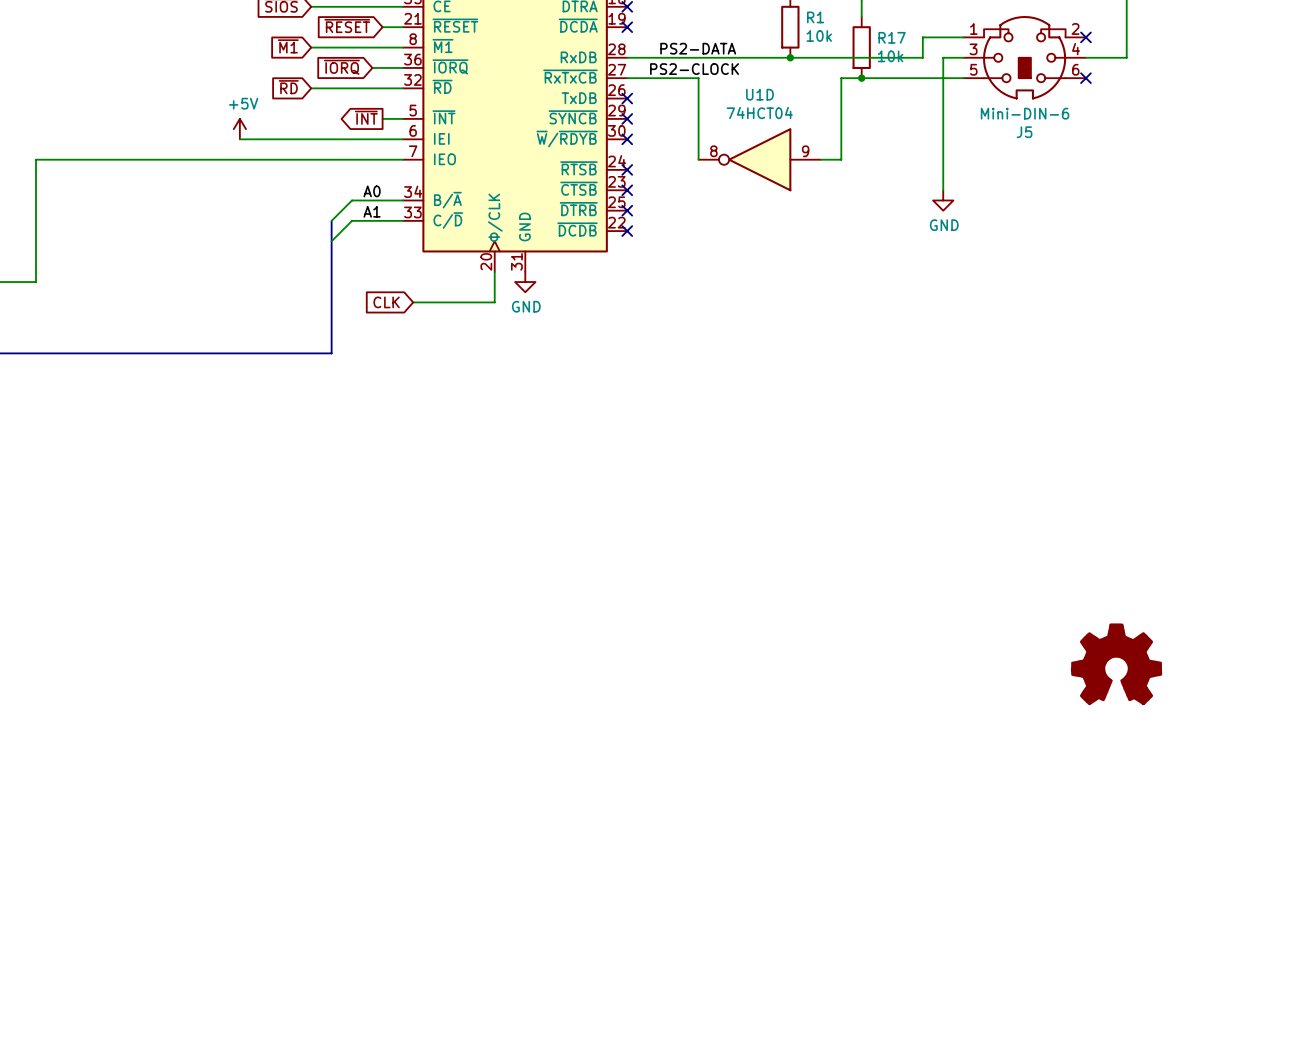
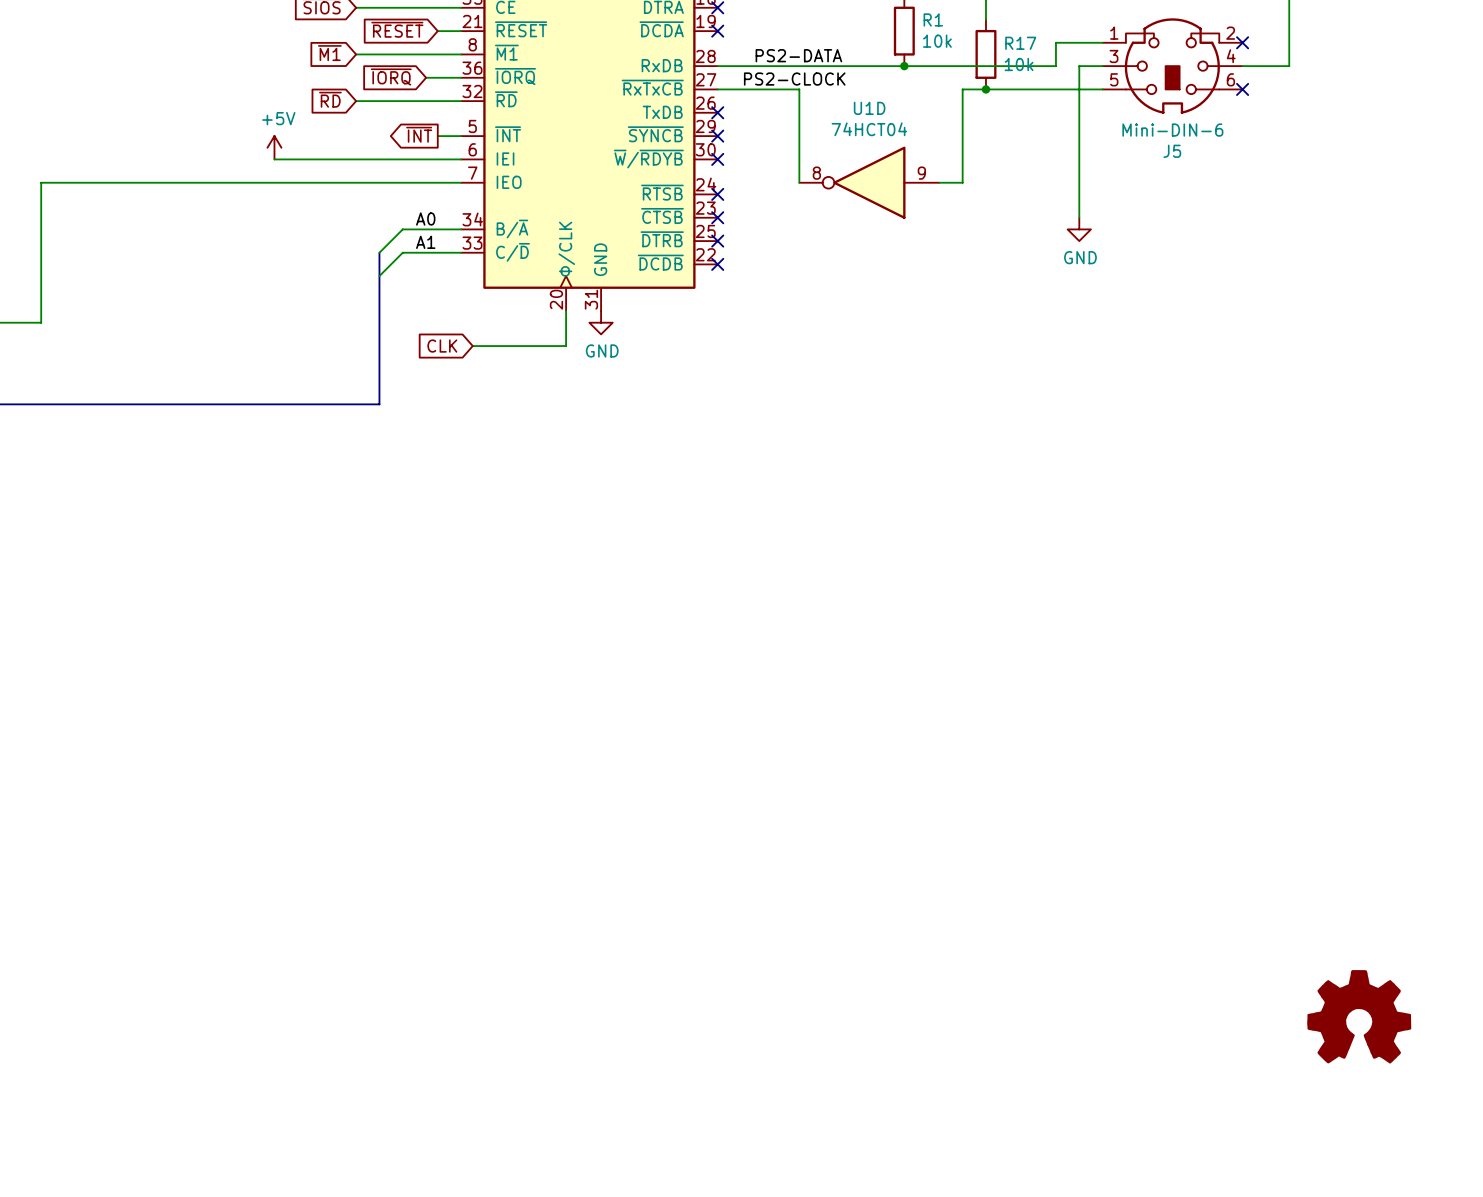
power symbol: (1116, 664) -> none
power symbol: none -> (1359, 1016)

